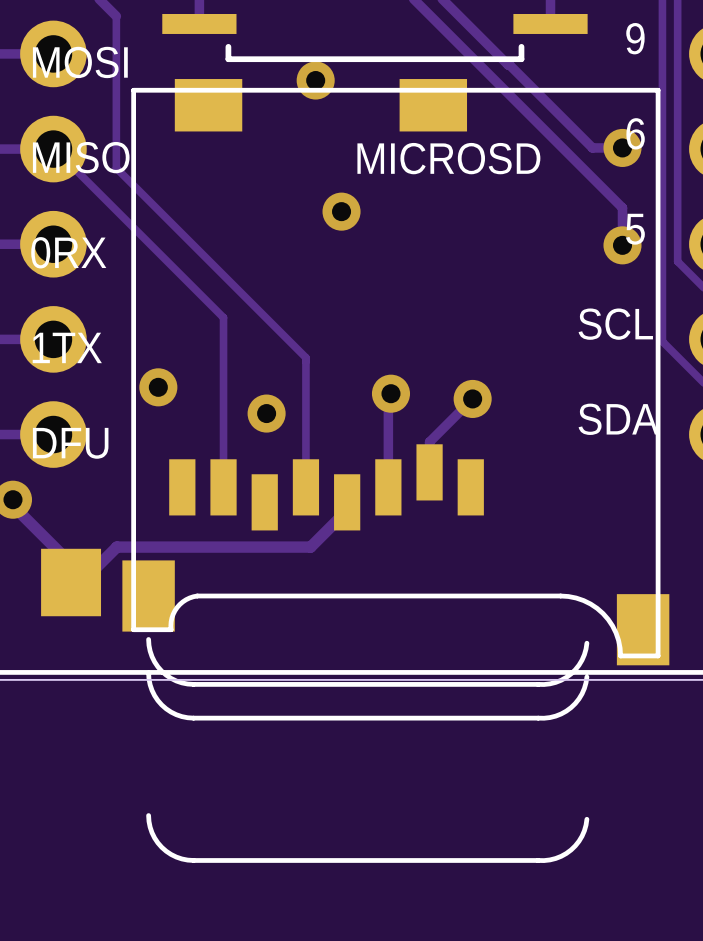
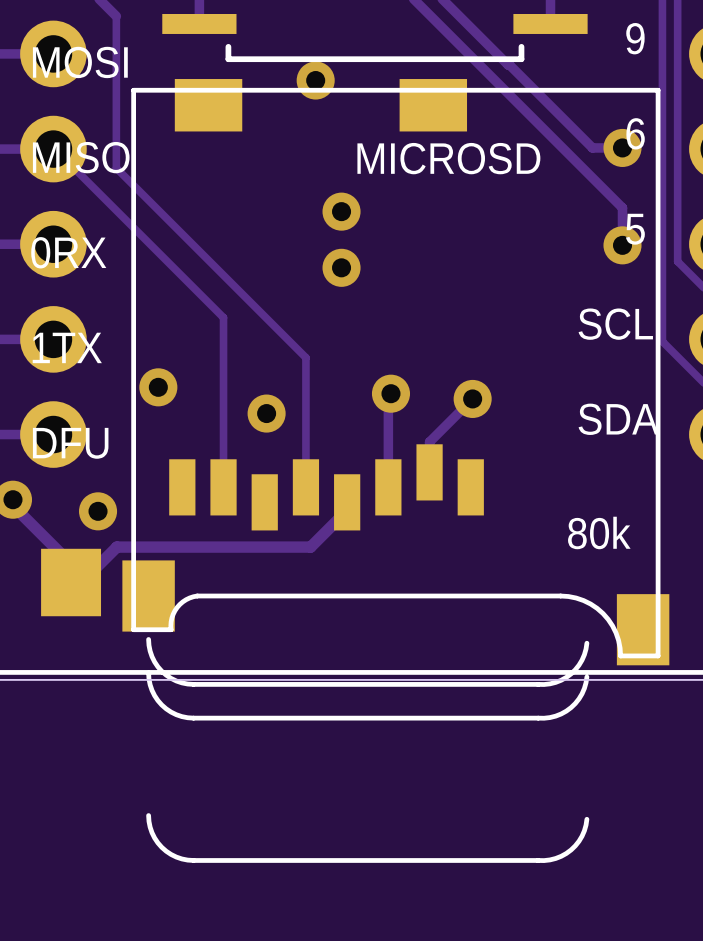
via: none -> (341, 267)
via: none -> (98, 511)
text: none -> 80k (599, 532)

